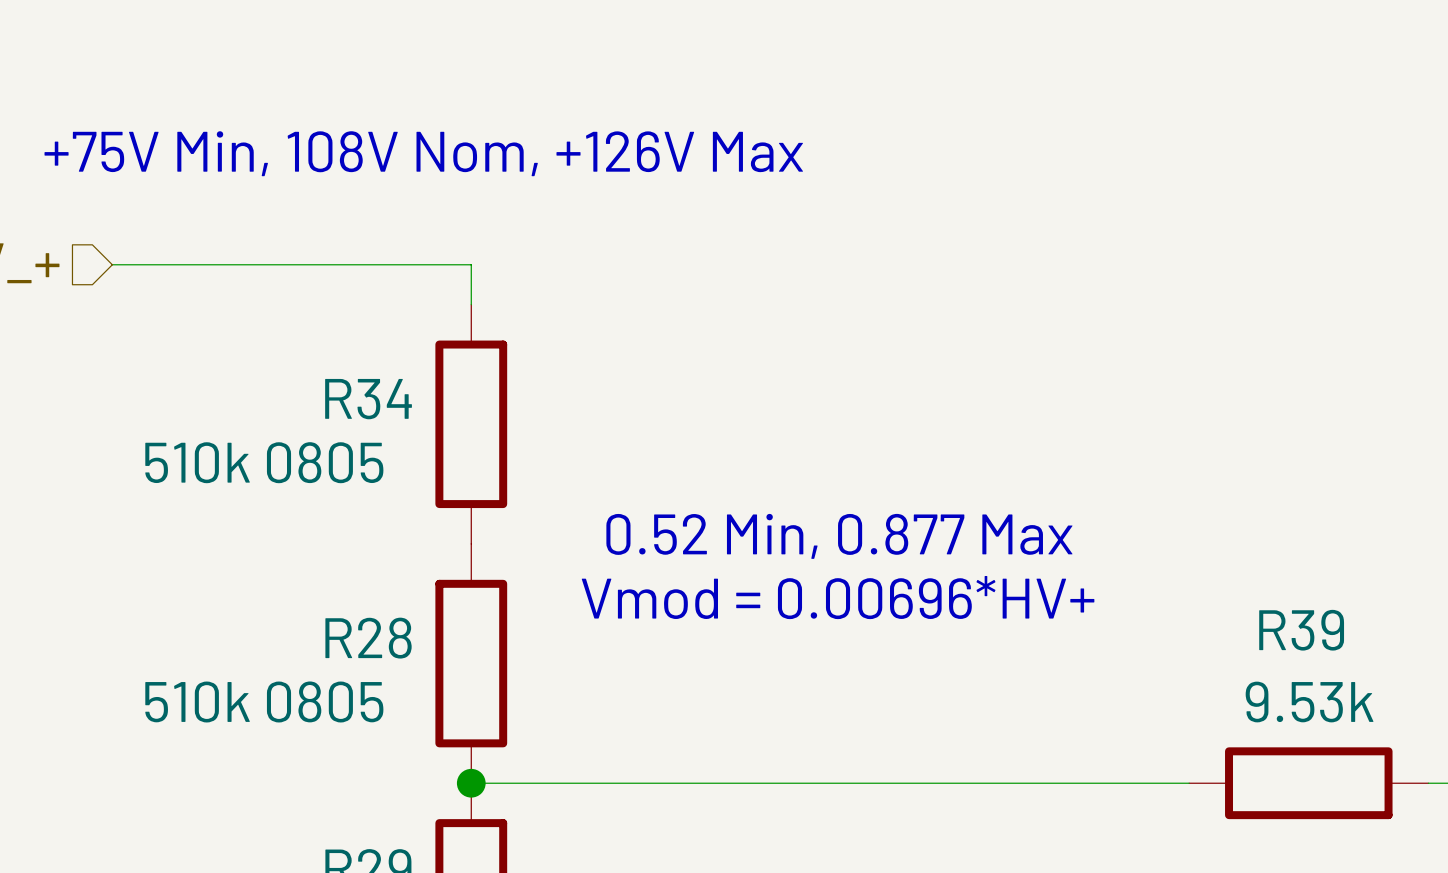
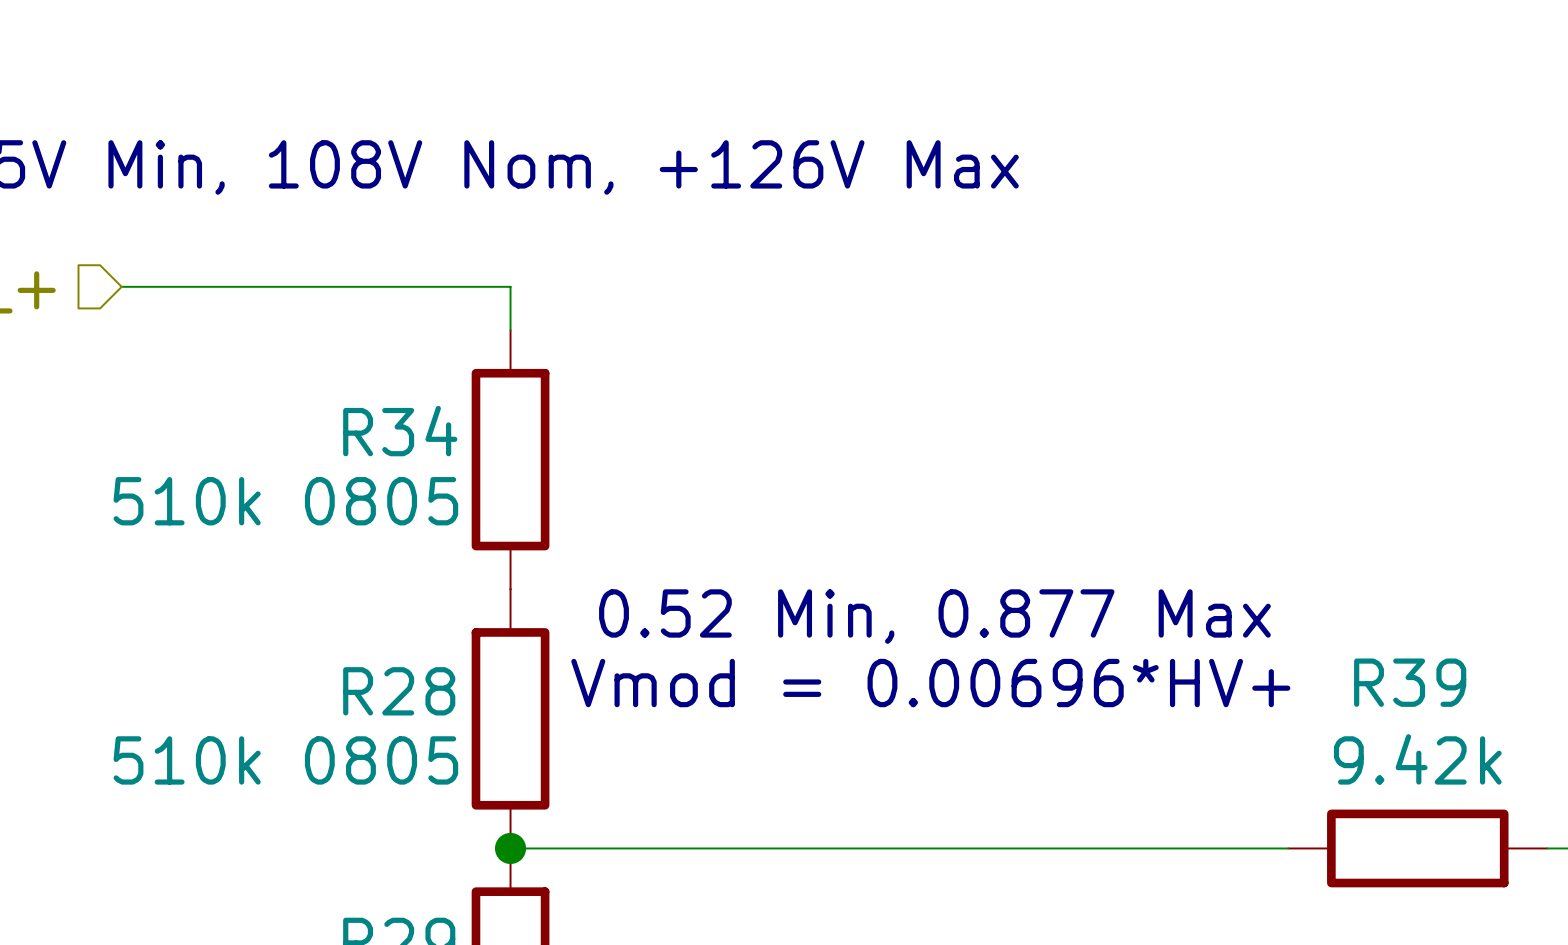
text position: 0.52 Min, 0.877 Max (839, 536) -> 0.52 Min, 0.877 Max (934, 616)
text position: Vmod = 0.00696*HV+ (838, 597) -> Vmod = 0.00696*HV+ (930, 683)
R39 value: 9.53k (1309, 702) -> 9.42k (1417, 759)

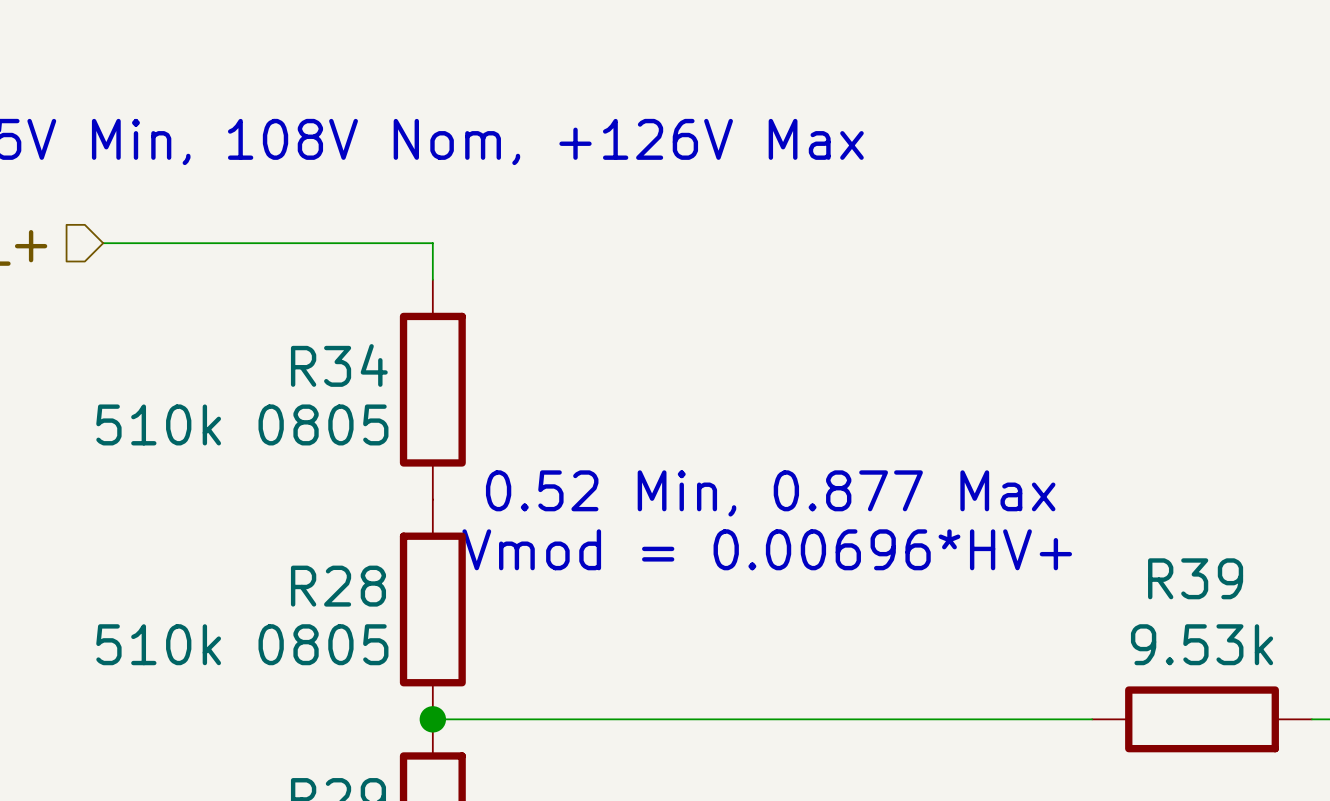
text position: 0.52 Min, 0.877 Max (934, 616) -> 0.52 Min, 0.877 Max (770, 493)
text position: Vmod = 0.00696*HV+ (930, 683) -> Vmod = 0.00696*HV+ (767, 549)
R39 value: 9.42k (1417, 759) -> 9.53k (1202, 644)

